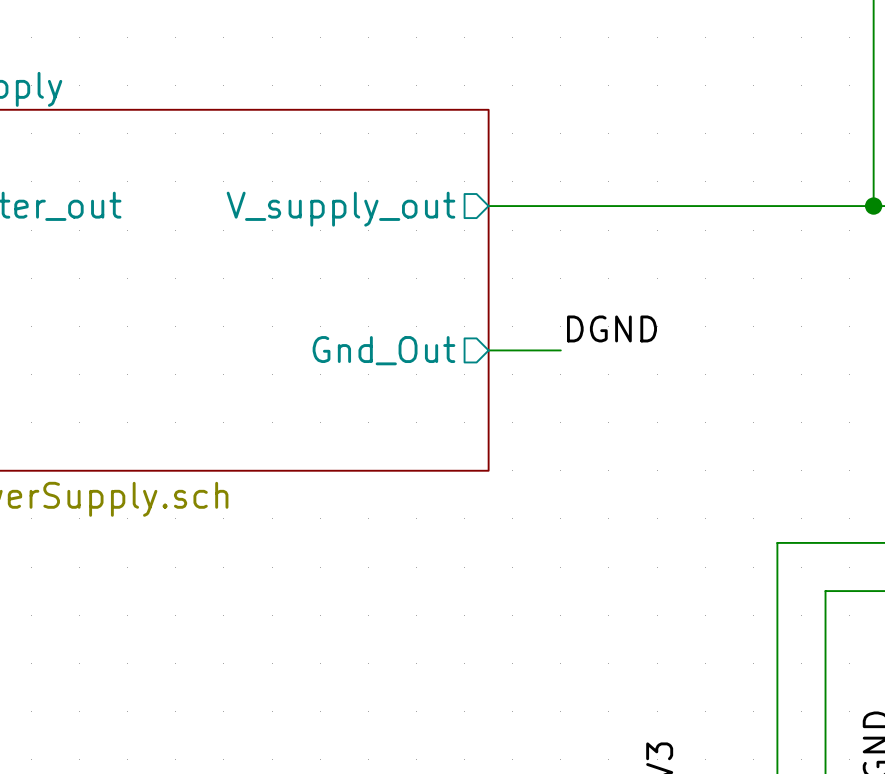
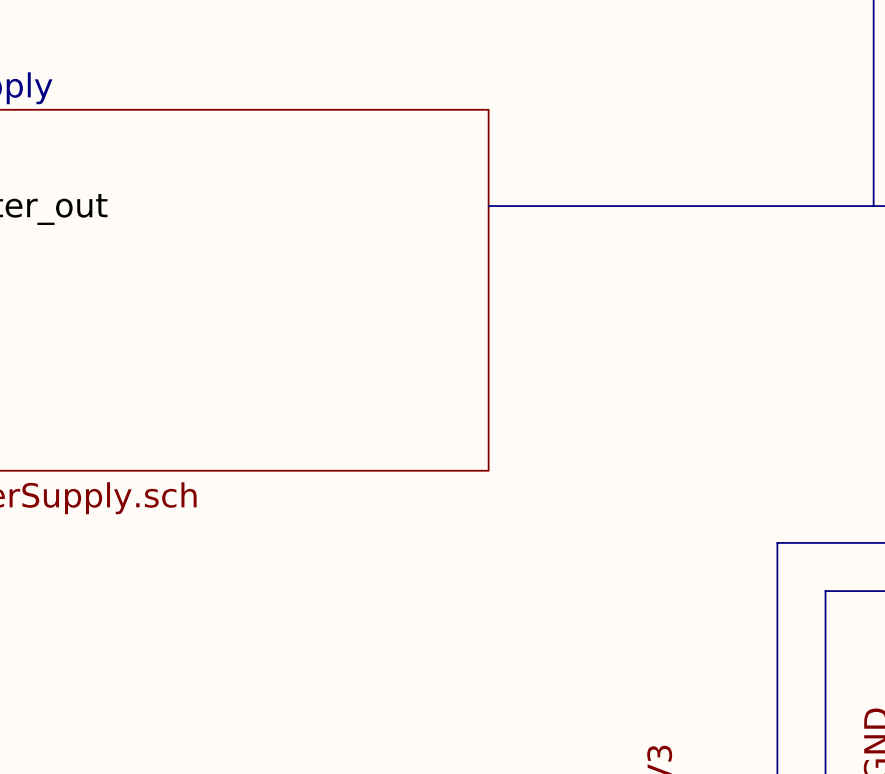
junction: (873, 206) -> none
sheet pin: V_supply_out (341, 209) -> none
label: DGND (611, 328) -> none
sheet pin: Gnd_Out (383, 350) -> none
wire: (488, 350) (560, 350) -> none

